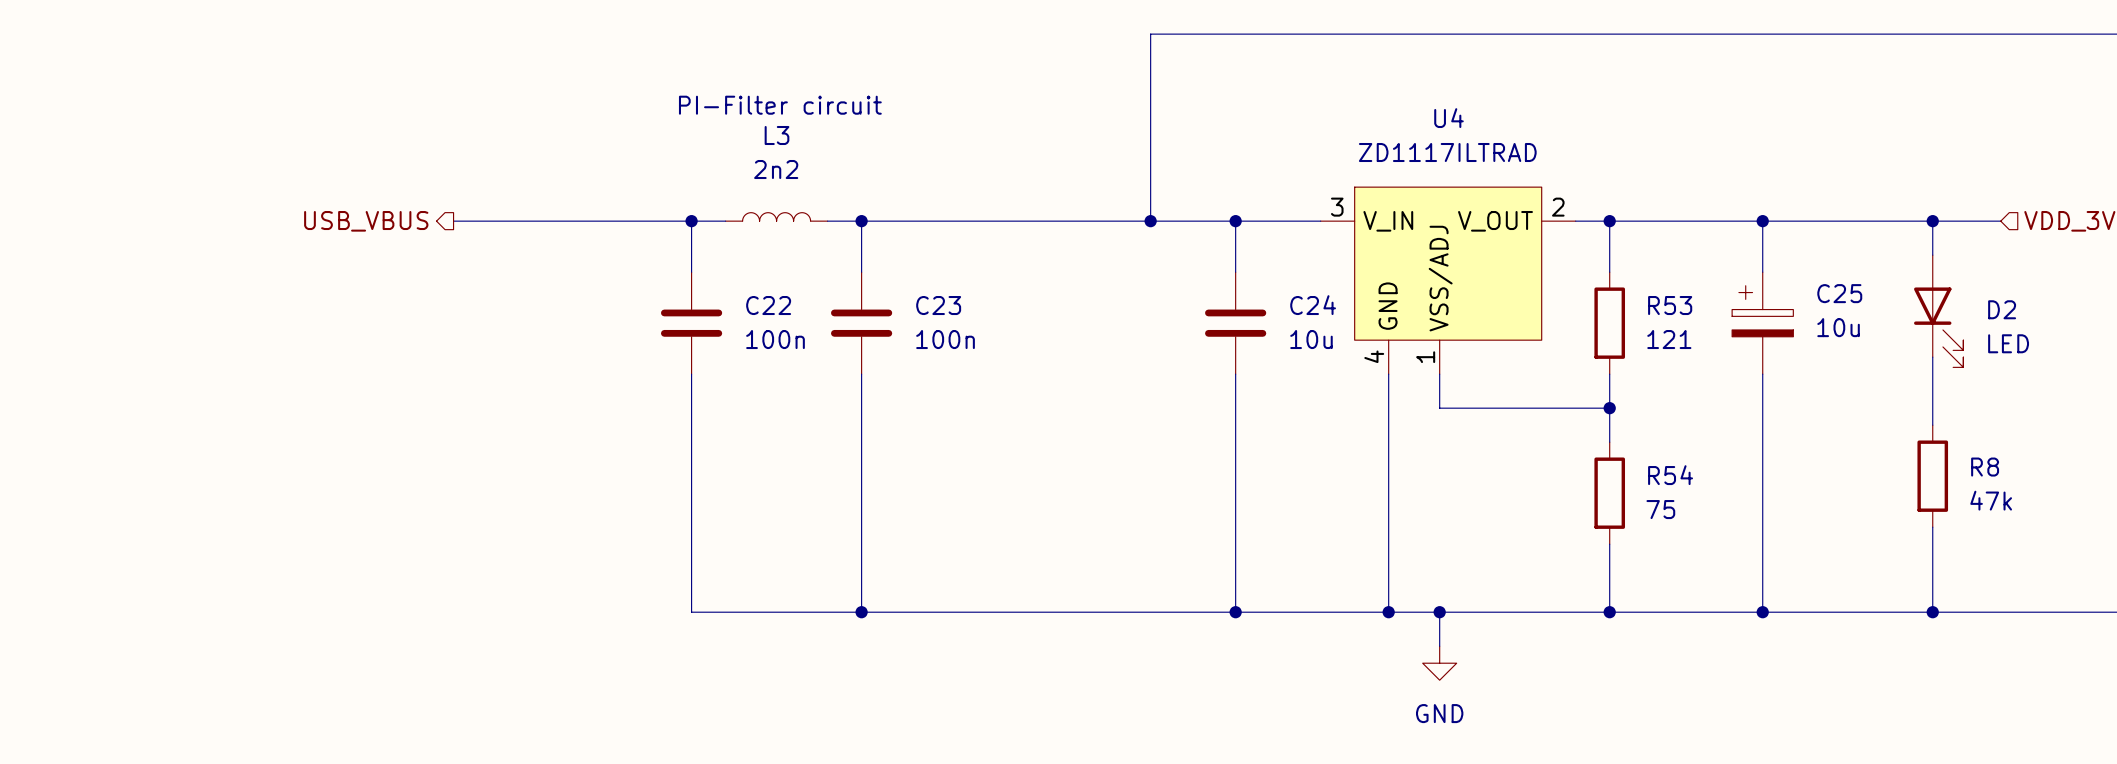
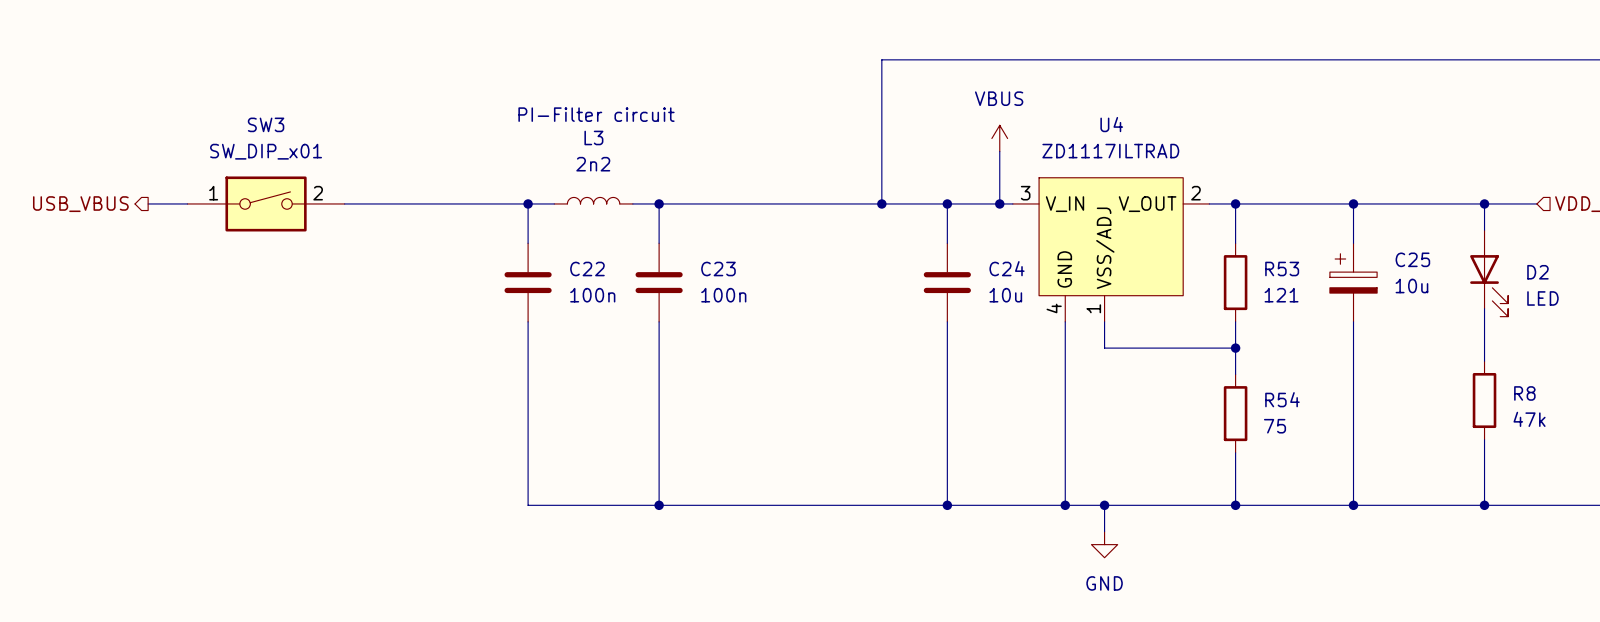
power symbol: none -> VBUS (999, 138)
wire: none -> (999, 151) (999, 203)
wire: none -> (148, 203) (187, 203)
SW3: none -> SW_DIP_x01 (266, 203)
hierarchical label position: USB_VBUS (366, 221) -> USB_VBUS (80, 204)
junction: none -> (999, 203)

